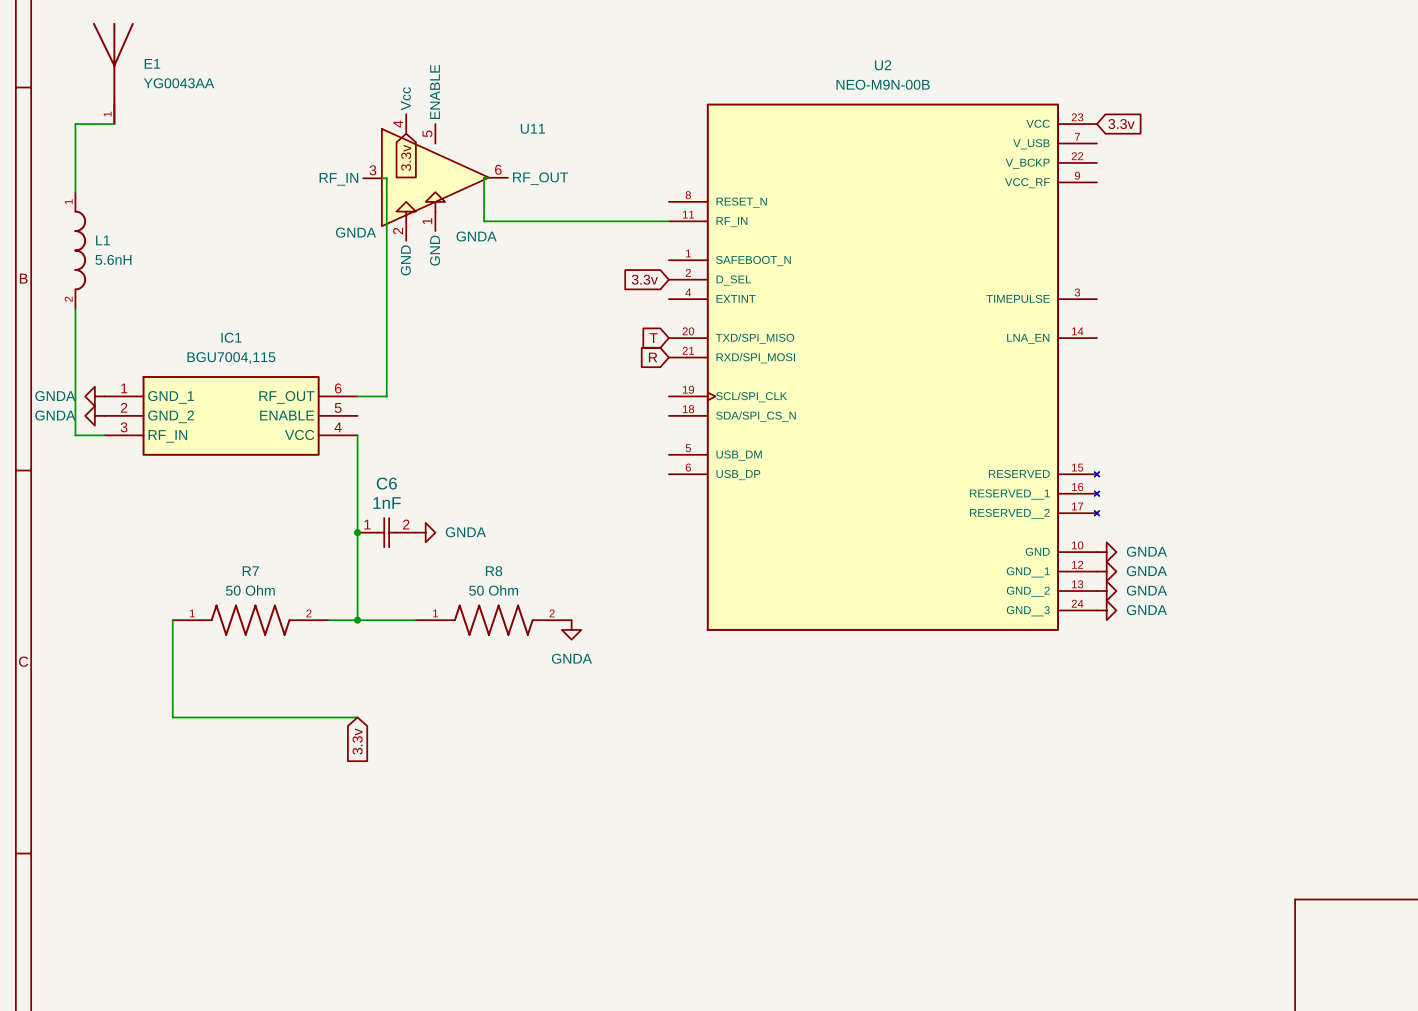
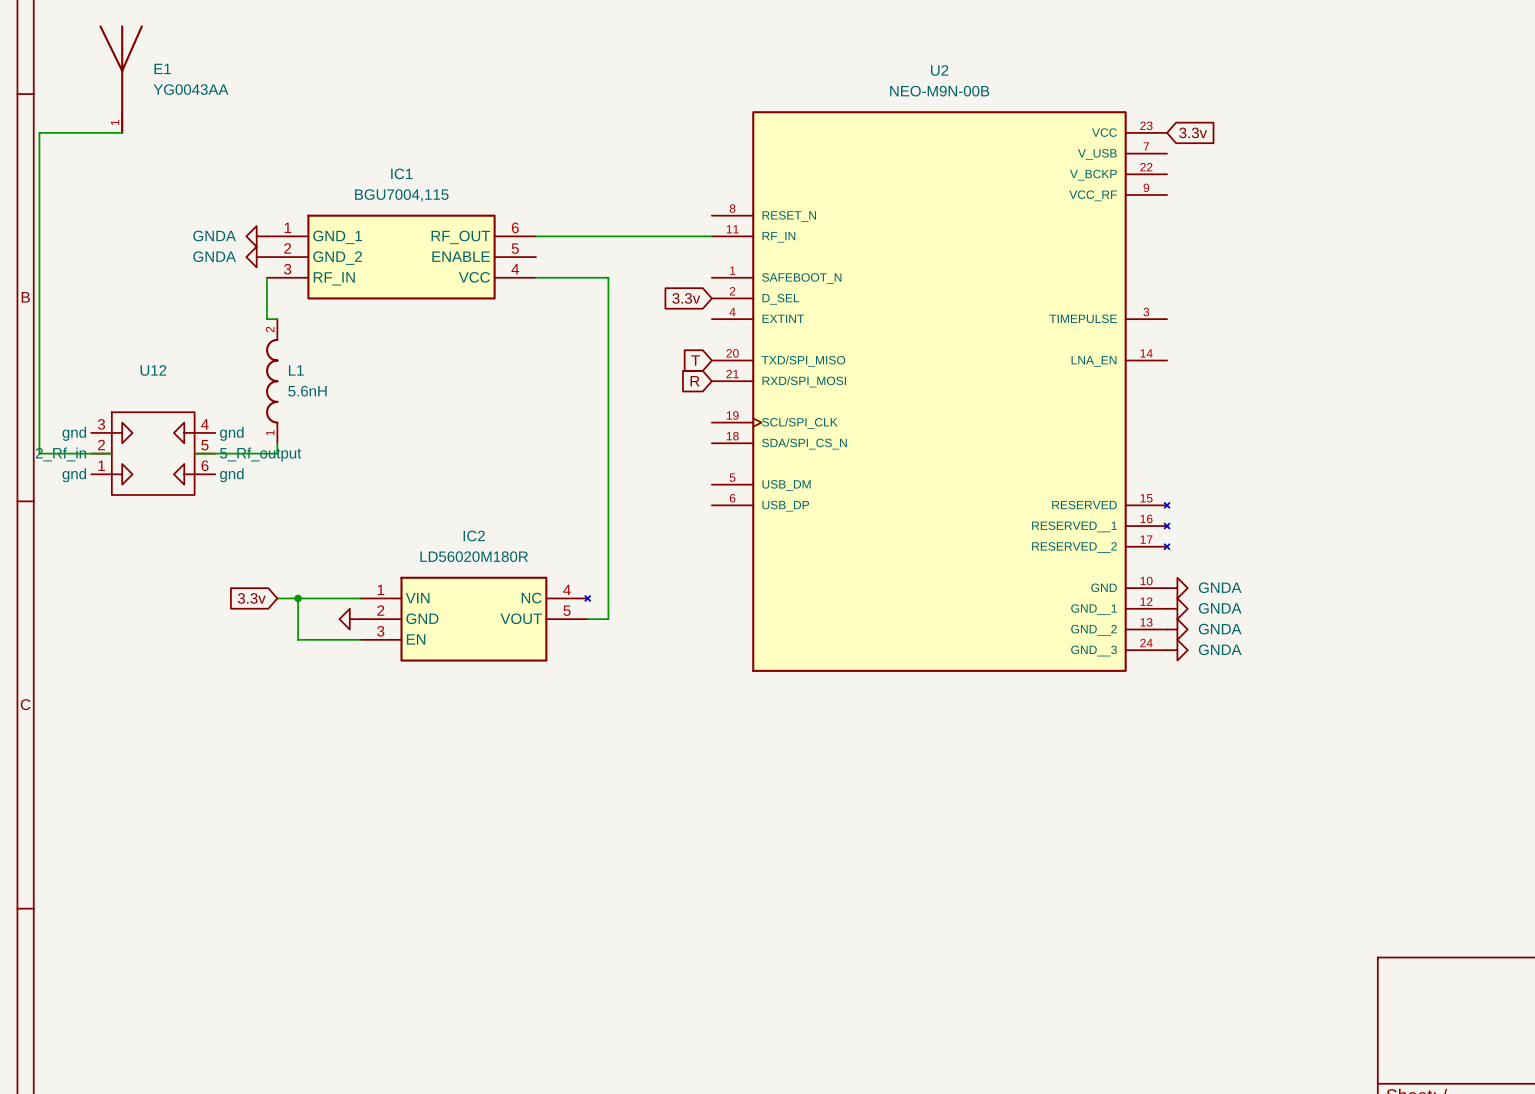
wire: (75, 124) (75, 192) -> (80, 132) (39, 132) (39, 453) (111, 453)
global label: 3.3v (406, 157) -> none
U11: (435, 177) -> none
wire: (488, 177) (484, 177) (484, 221) (503, 221) -> none
wire: (382, 178) (386, 178) (386, 396) (357, 396) -> none
power symbol: GNDA (435, 201) -> none
power symbol: GNDA (406, 211) -> none
power symbol: none -> GNDA (256, 236)
power symbol: none -> GNDA (256, 257)
L1 rotation: 0° (80, 250) -> 180° (272, 381)
L1 position: (80, 250) -> (272, 381)
wire: none -> (267, 277) (267, 319) (277, 319)
wire: none -> (536, 277) (608, 277) (608, 619) (587, 619)
wire: (75, 308) (75, 435) (104, 435) -> none
power symbol: GNDA (94, 396) -> none
power symbol: none -> (122, 432)
power symbol: none -> (184, 432)
power symbol: GNDA (94, 415) -> none
IC1 position: (231, 415) -> (401, 257)
U12: none -> (153, 453)
wire: (357, 435) (357, 620) -> none
power symbol: none -> (122, 474)
power symbol: none -> (184, 474)
junction: (357, 532) -> none
C6: 1nF (386, 532) -> none
power symbol: GNDA (425, 532) -> none
wire: none -> (277, 598) (360, 598)
wire: none -> (298, 598) (298, 639) (360, 639)
junction: none -> (298, 598)
power symbol: none -> (349, 619)
IC2: none -> LD56020M180R (475, 619)
wire: (172, 620) (172, 717) (357, 717) -> none
R7: 50 Ohm (250, 620) -> none
wire: (328, 620) (415, 620) -> none
junction: (357, 620) -> none
R8: 50 Ohm (493, 620) -> none
power symbol: GNDA (571, 629) -> none
global label rotation: 0° (357, 741) -> 90° clockwise (251, 598)
global label position: 3.3v (357, 741) -> 3.3v (251, 598)

